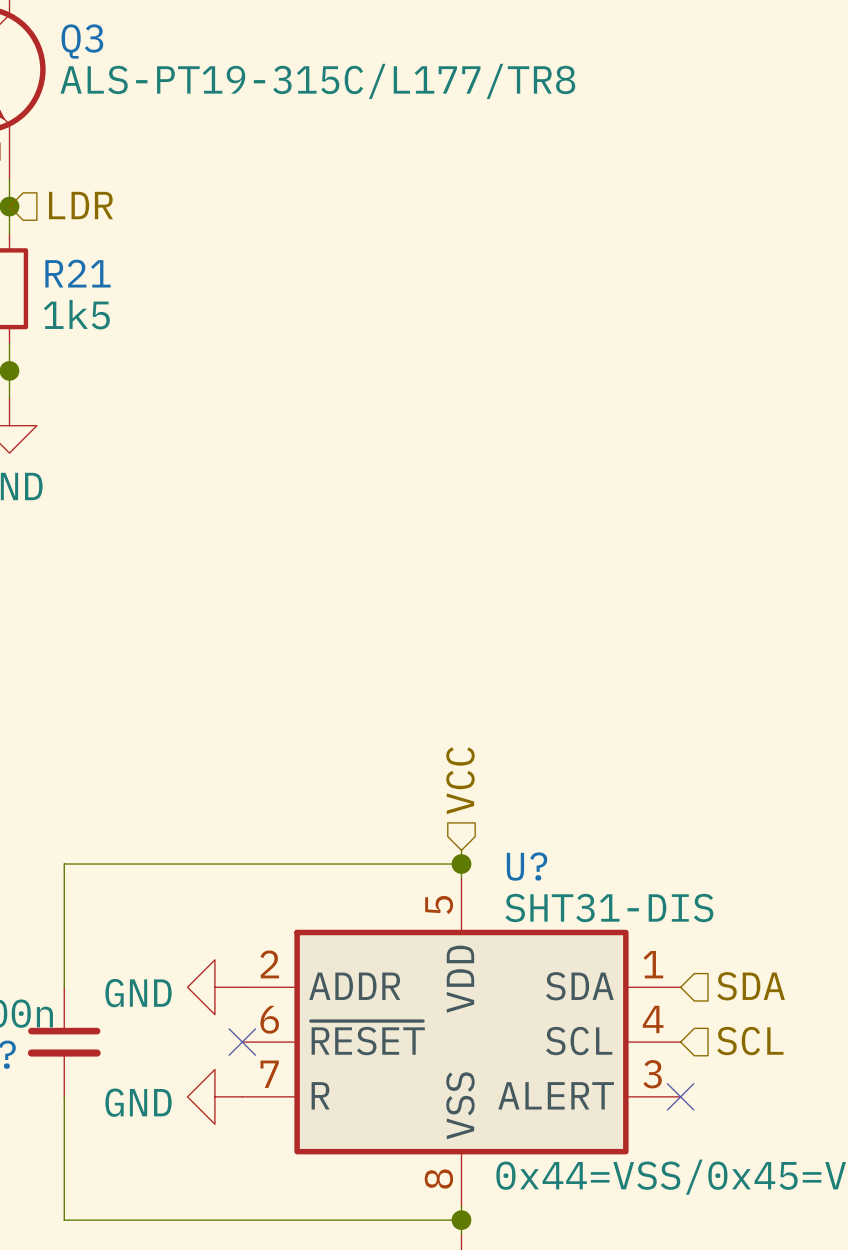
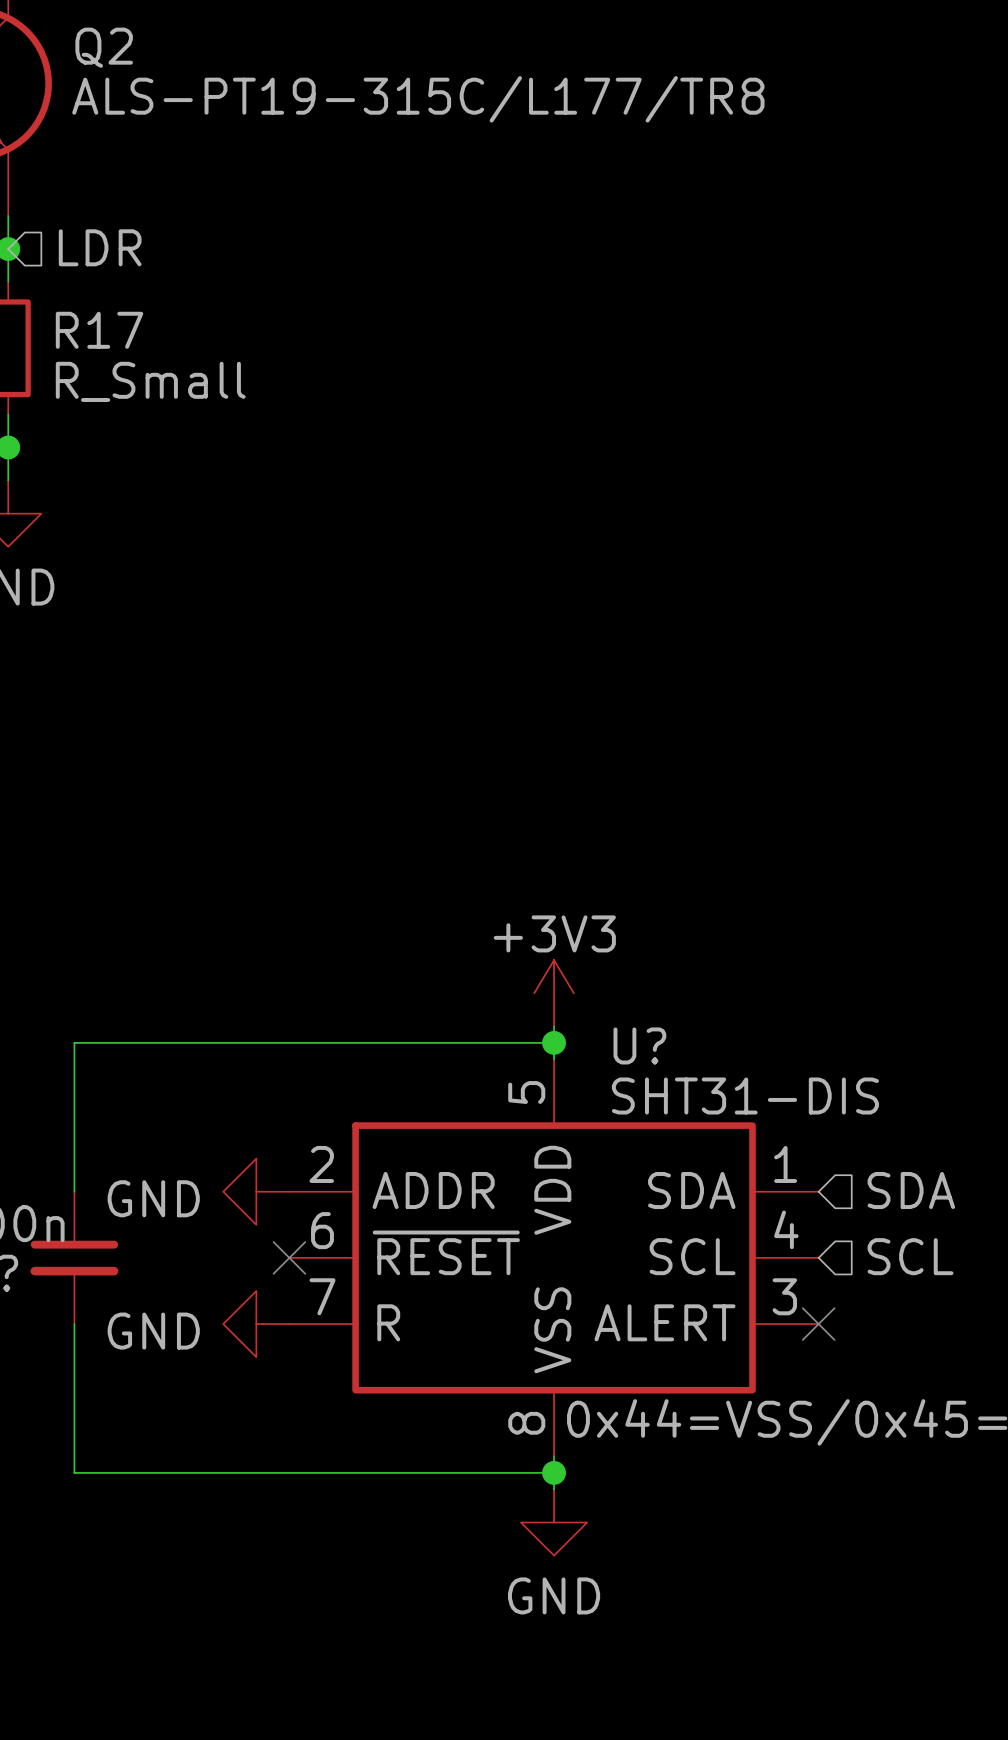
Q3 name: Q3 (82, 41) -> Q2 (104, 47)
R21 name: R21 (77, 273) -> R17 (99, 330)
R21 value: 1k5 (76, 314) -> R_Small (150, 381)
hierarchical label: VCC (460, 780) -> none
power symbol: none -> +3V3 (554, 993)

